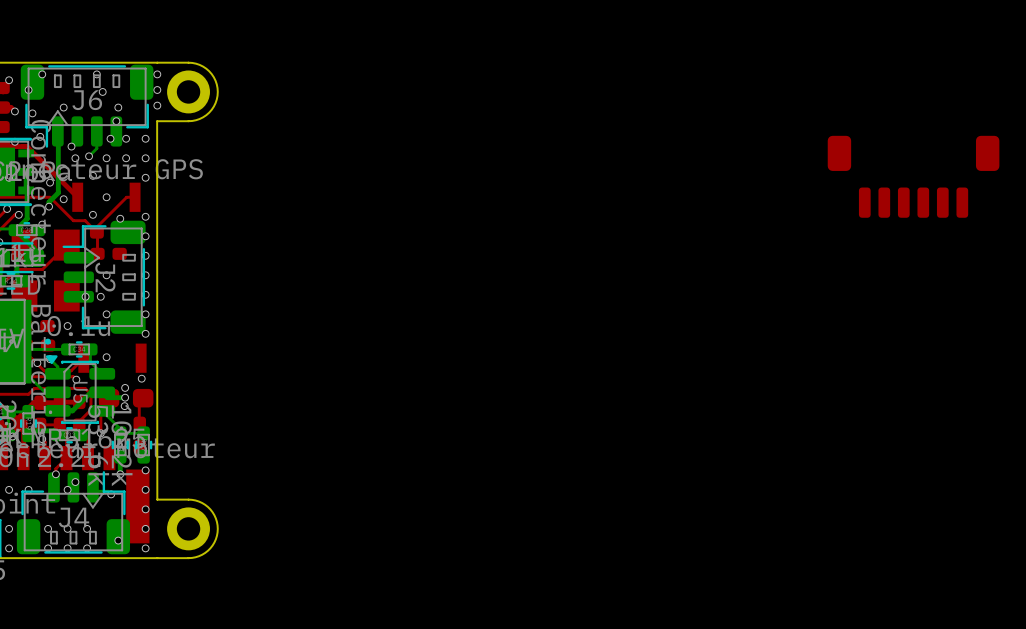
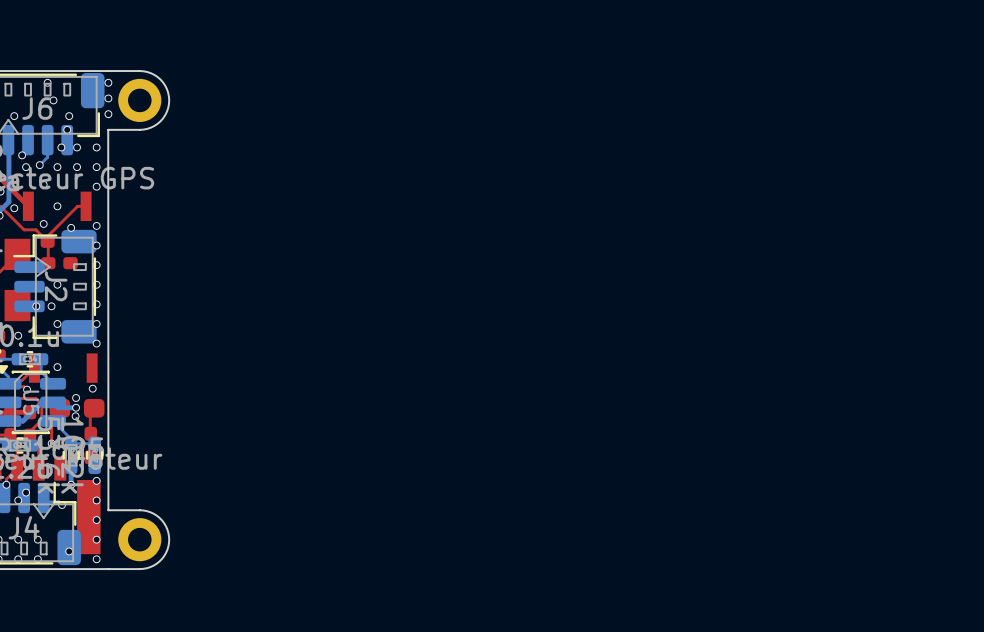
part: (913, 176) -> none

